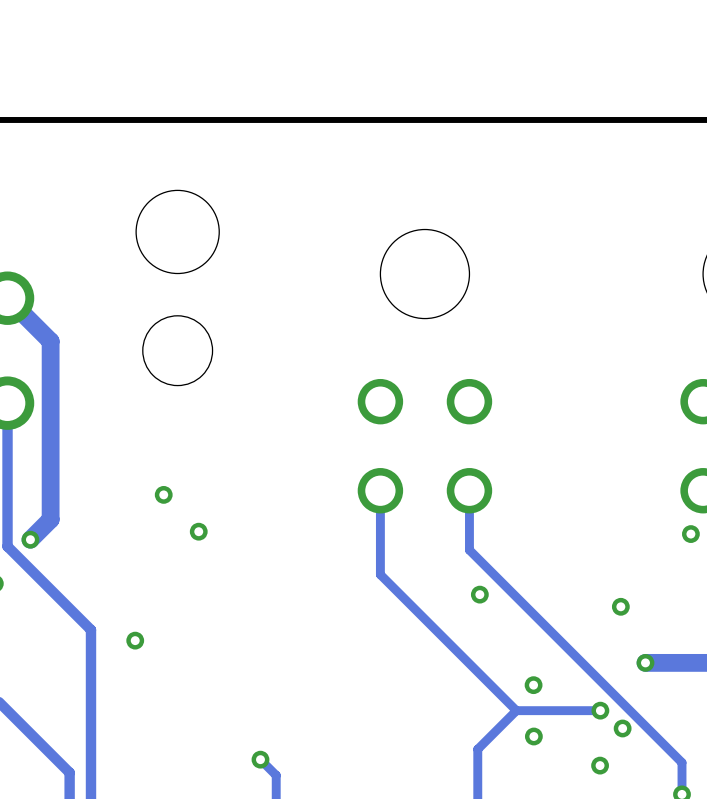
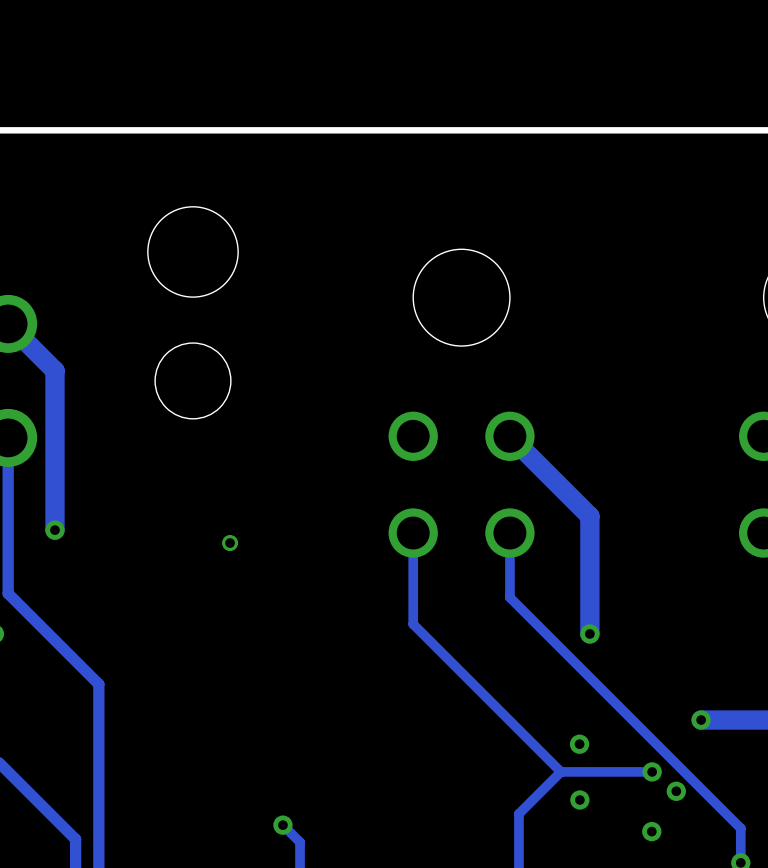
track: none -> (509, 436) (589, 516) (589, 633)
track: (50, 488) (50, 519) (30, 539) -> none
via: (163, 494) -> none
via: none -> (230, 543)
via: (198, 531) -> none
via: (690, 534) -> none
via position: (30, 539) -> (54, 530)
via: none -> (589, 633)
via: (479, 594) -> none
via: (620, 606) -> none
via: (135, 640) -> none

